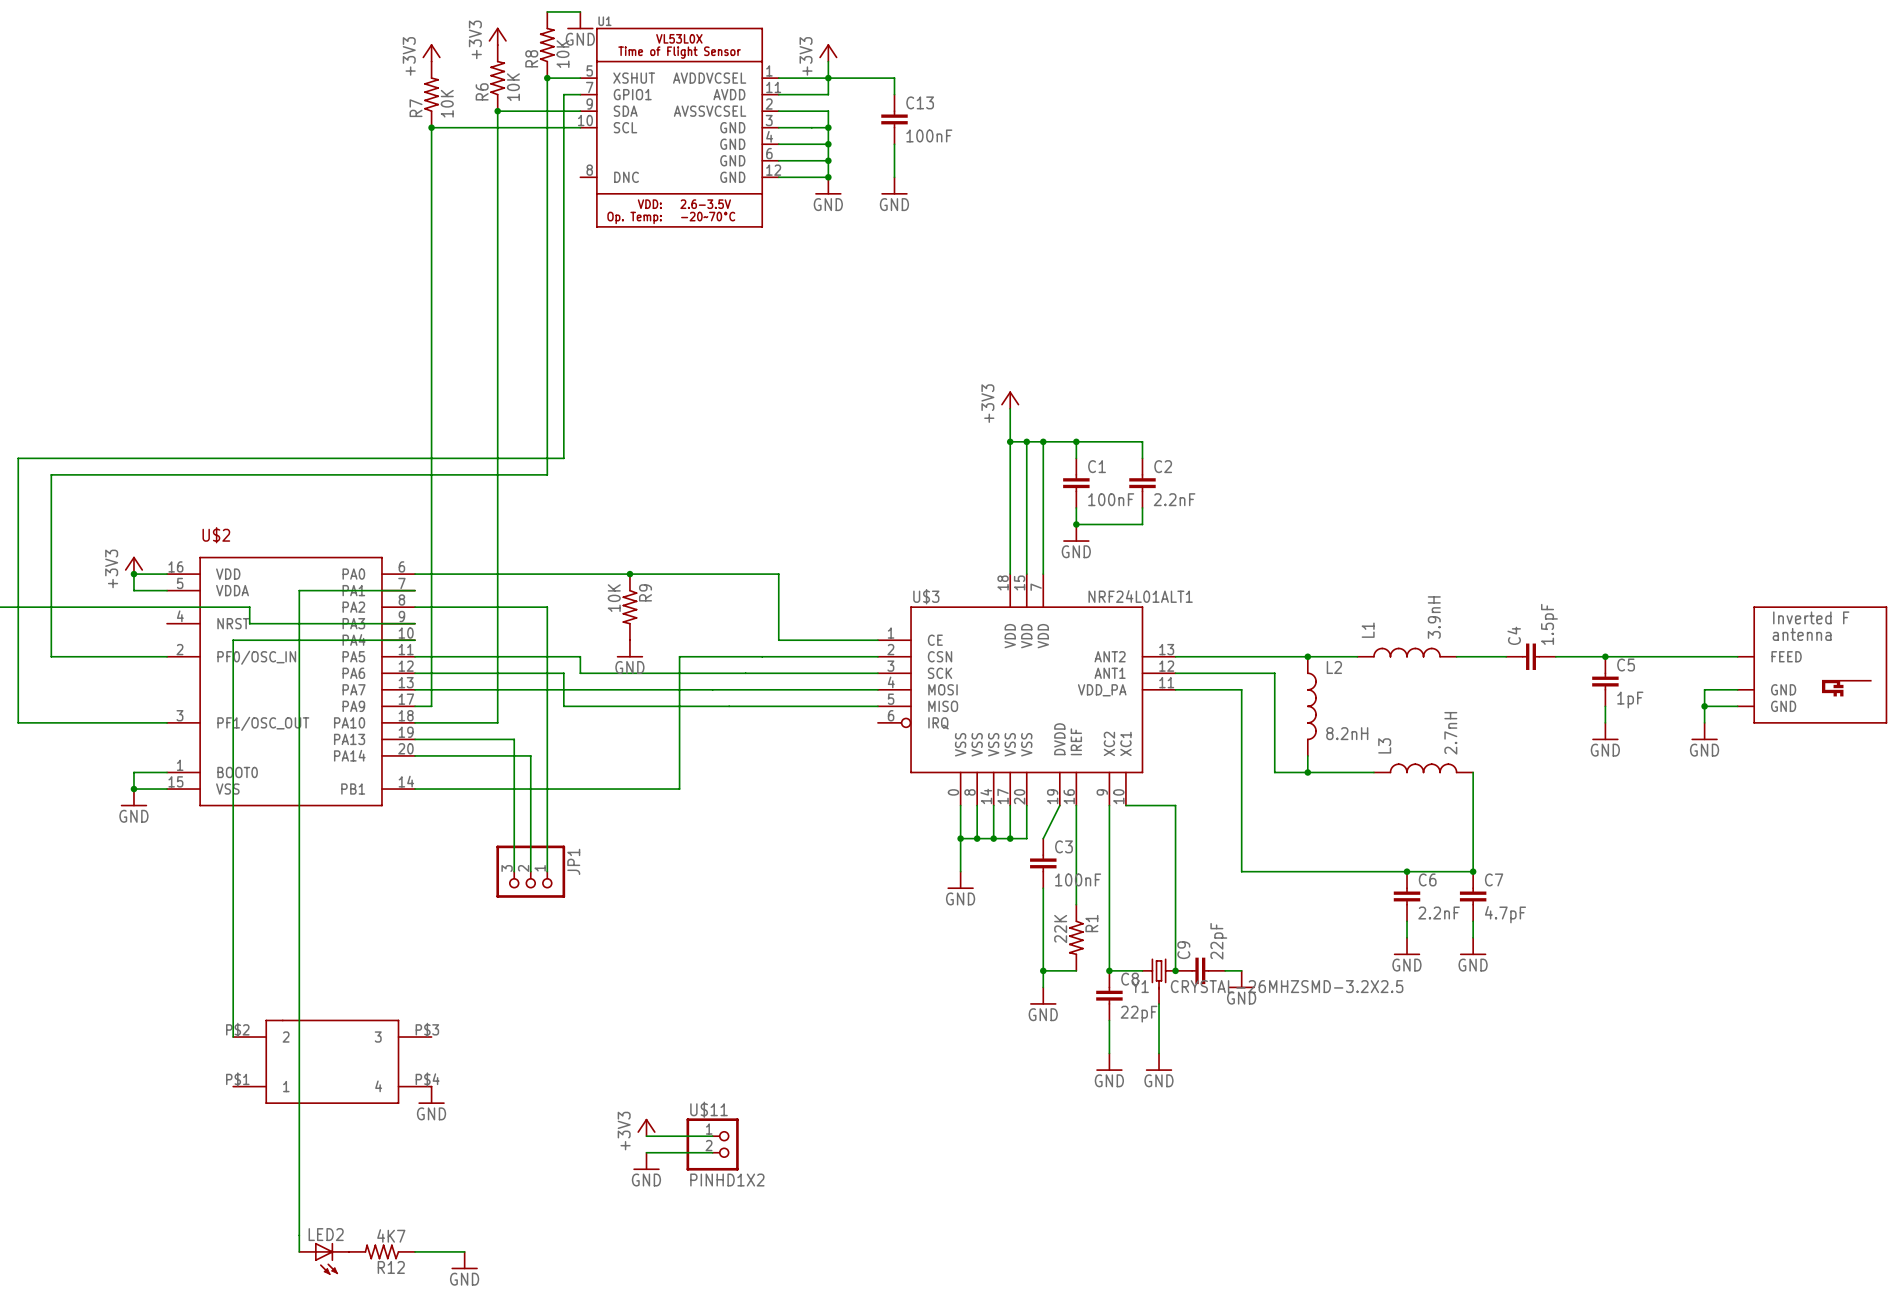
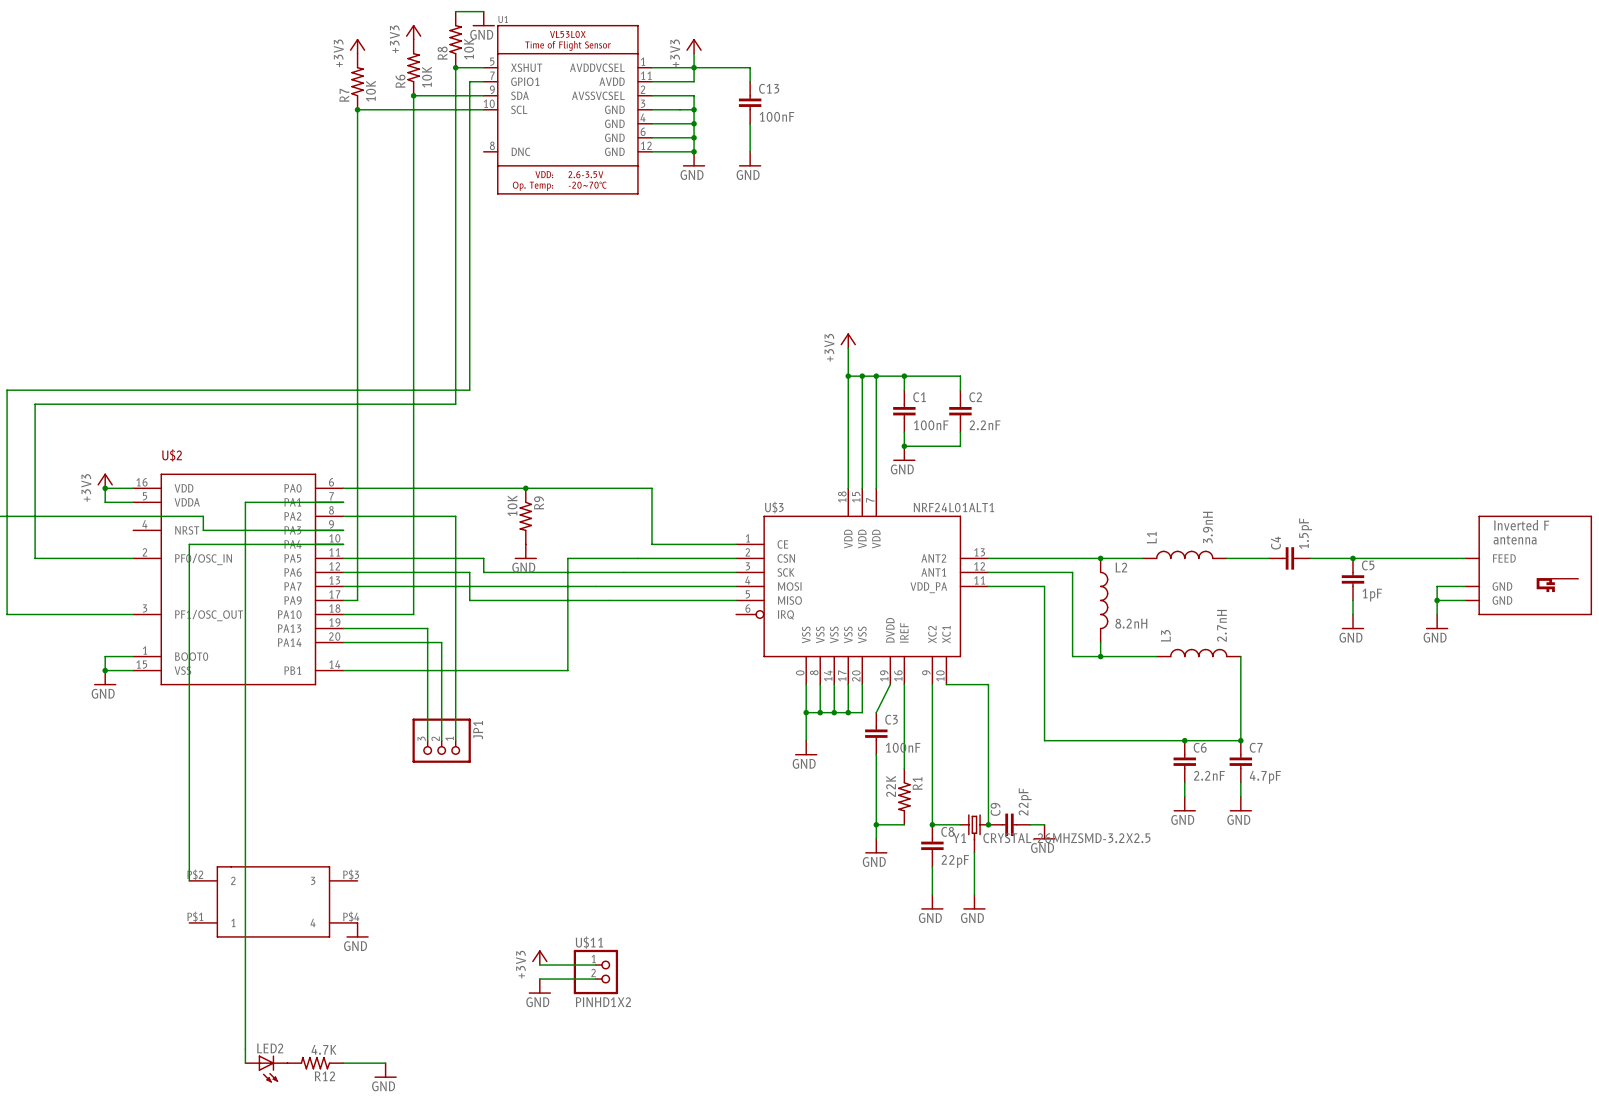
R12 value: 4K7 (391, 1235) -> 4.7K (324, 1049)

